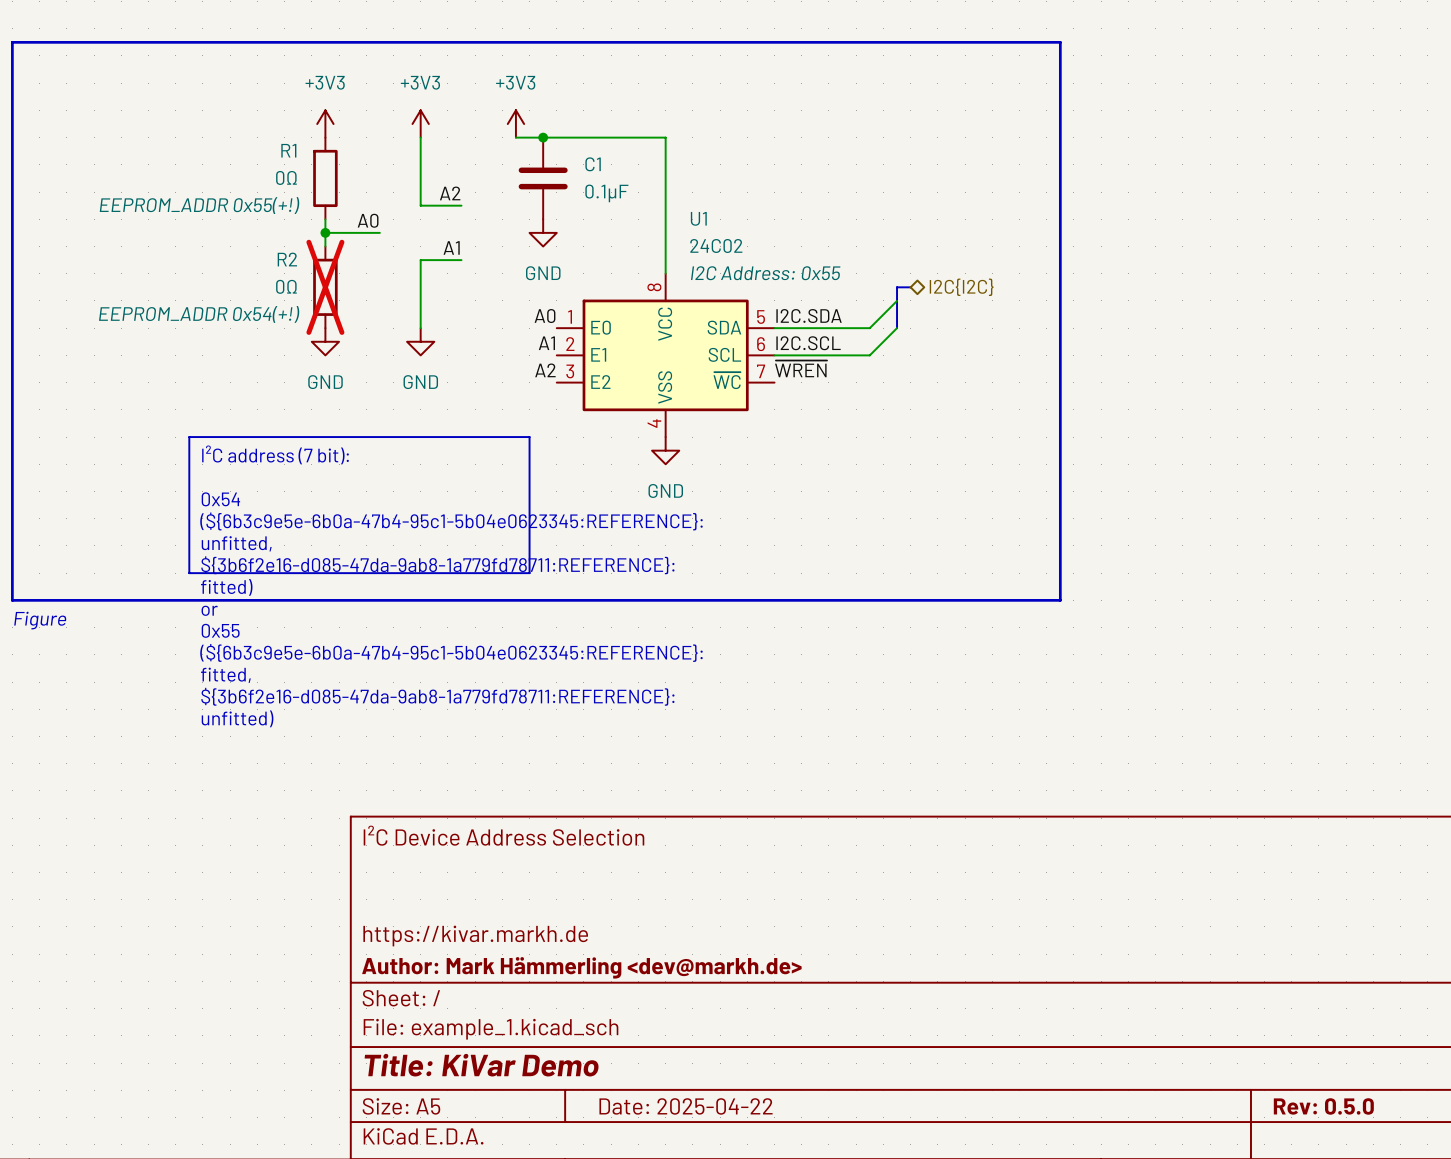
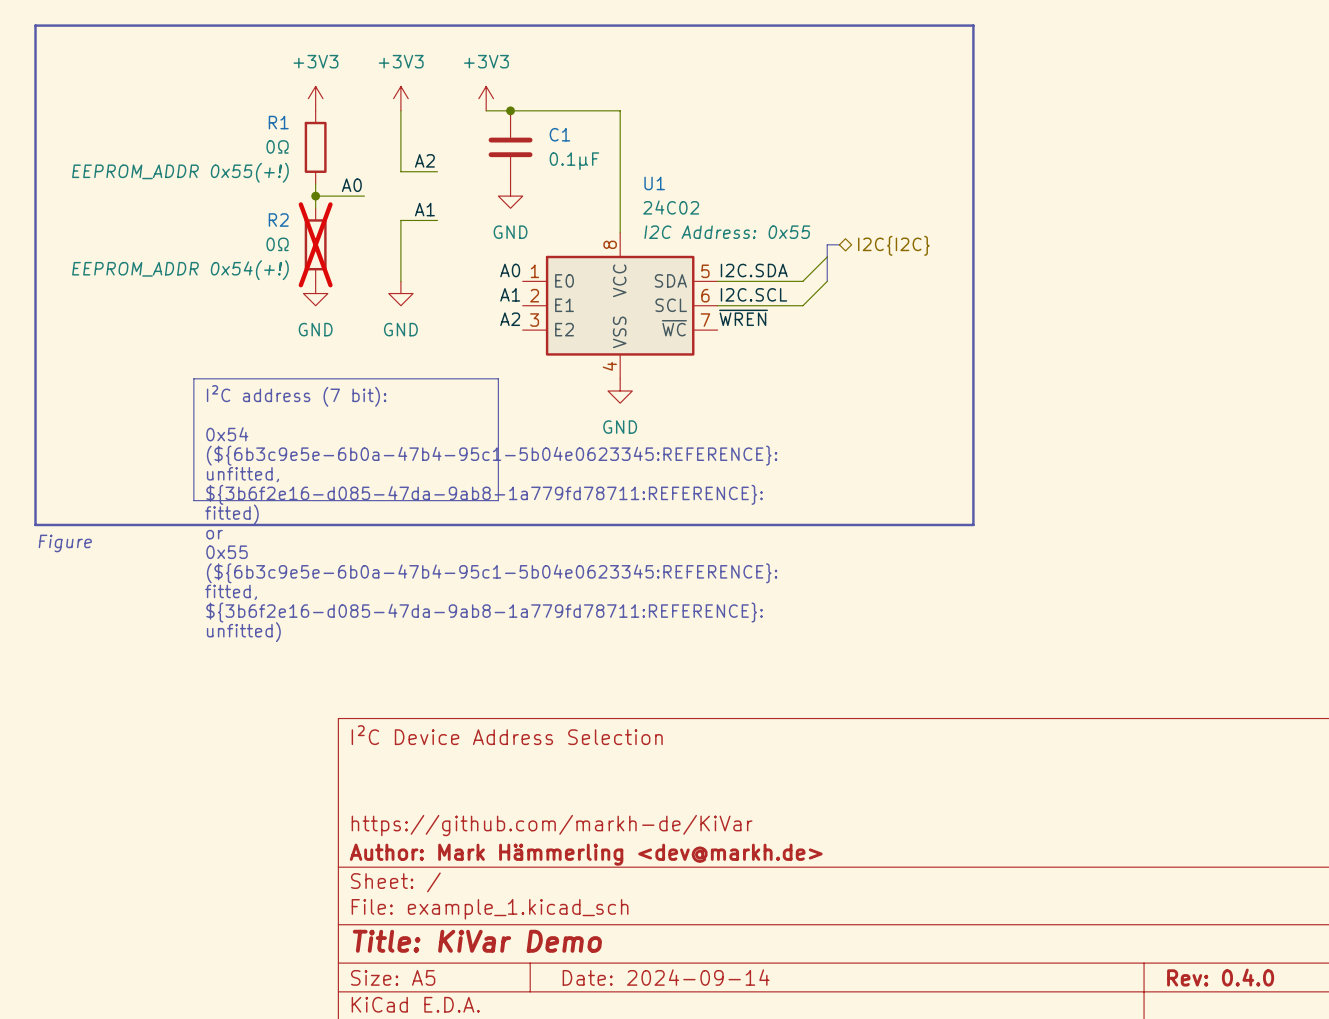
title block: https://kivar.markh.de (475, 936) -> https://github.com/markh-de/KiVar (552, 825)
title block: Date: 2025-04-22 (686, 1106) -> Date: 2024-09-14 (666, 977)
title block: Rev: 0.5.0 (1323, 1106) -> Rev: 0.4.0 (1220, 977)

